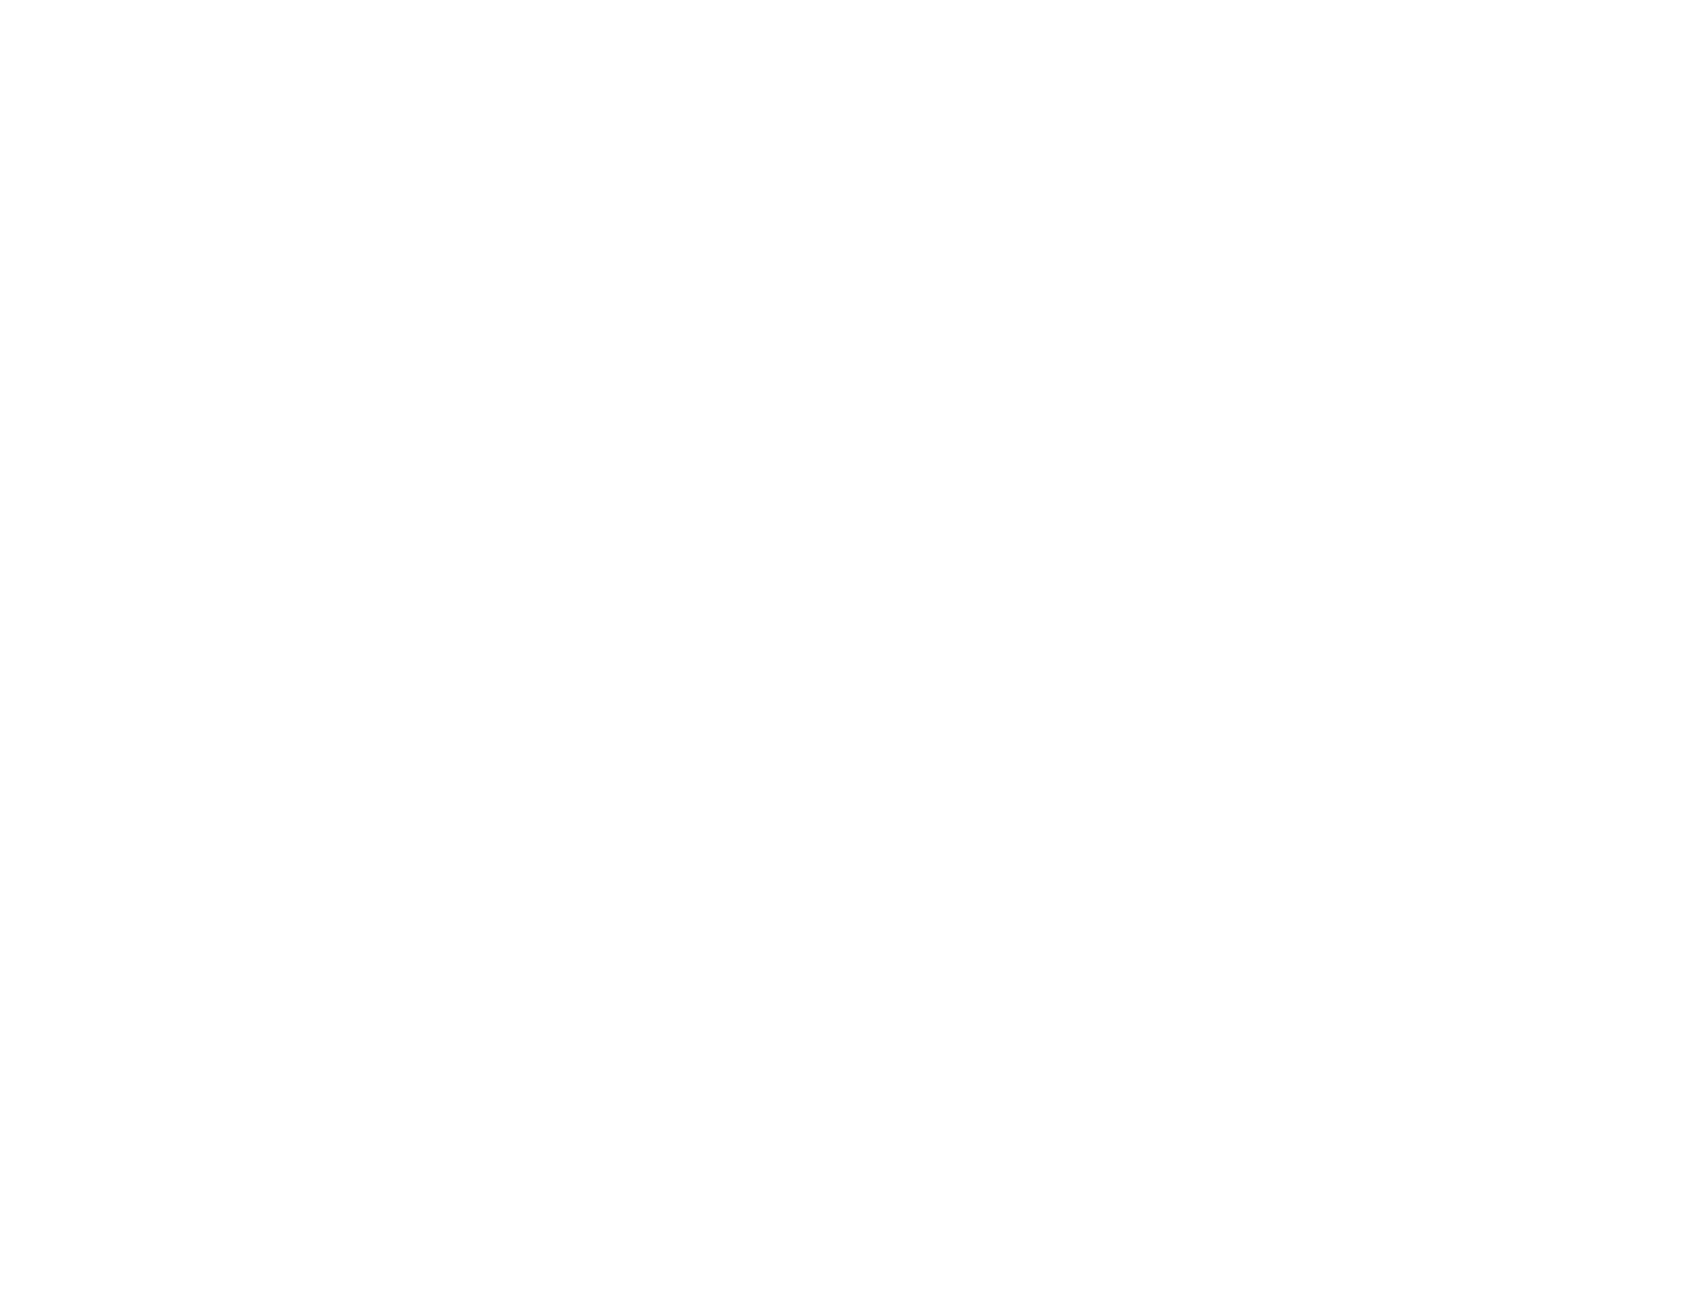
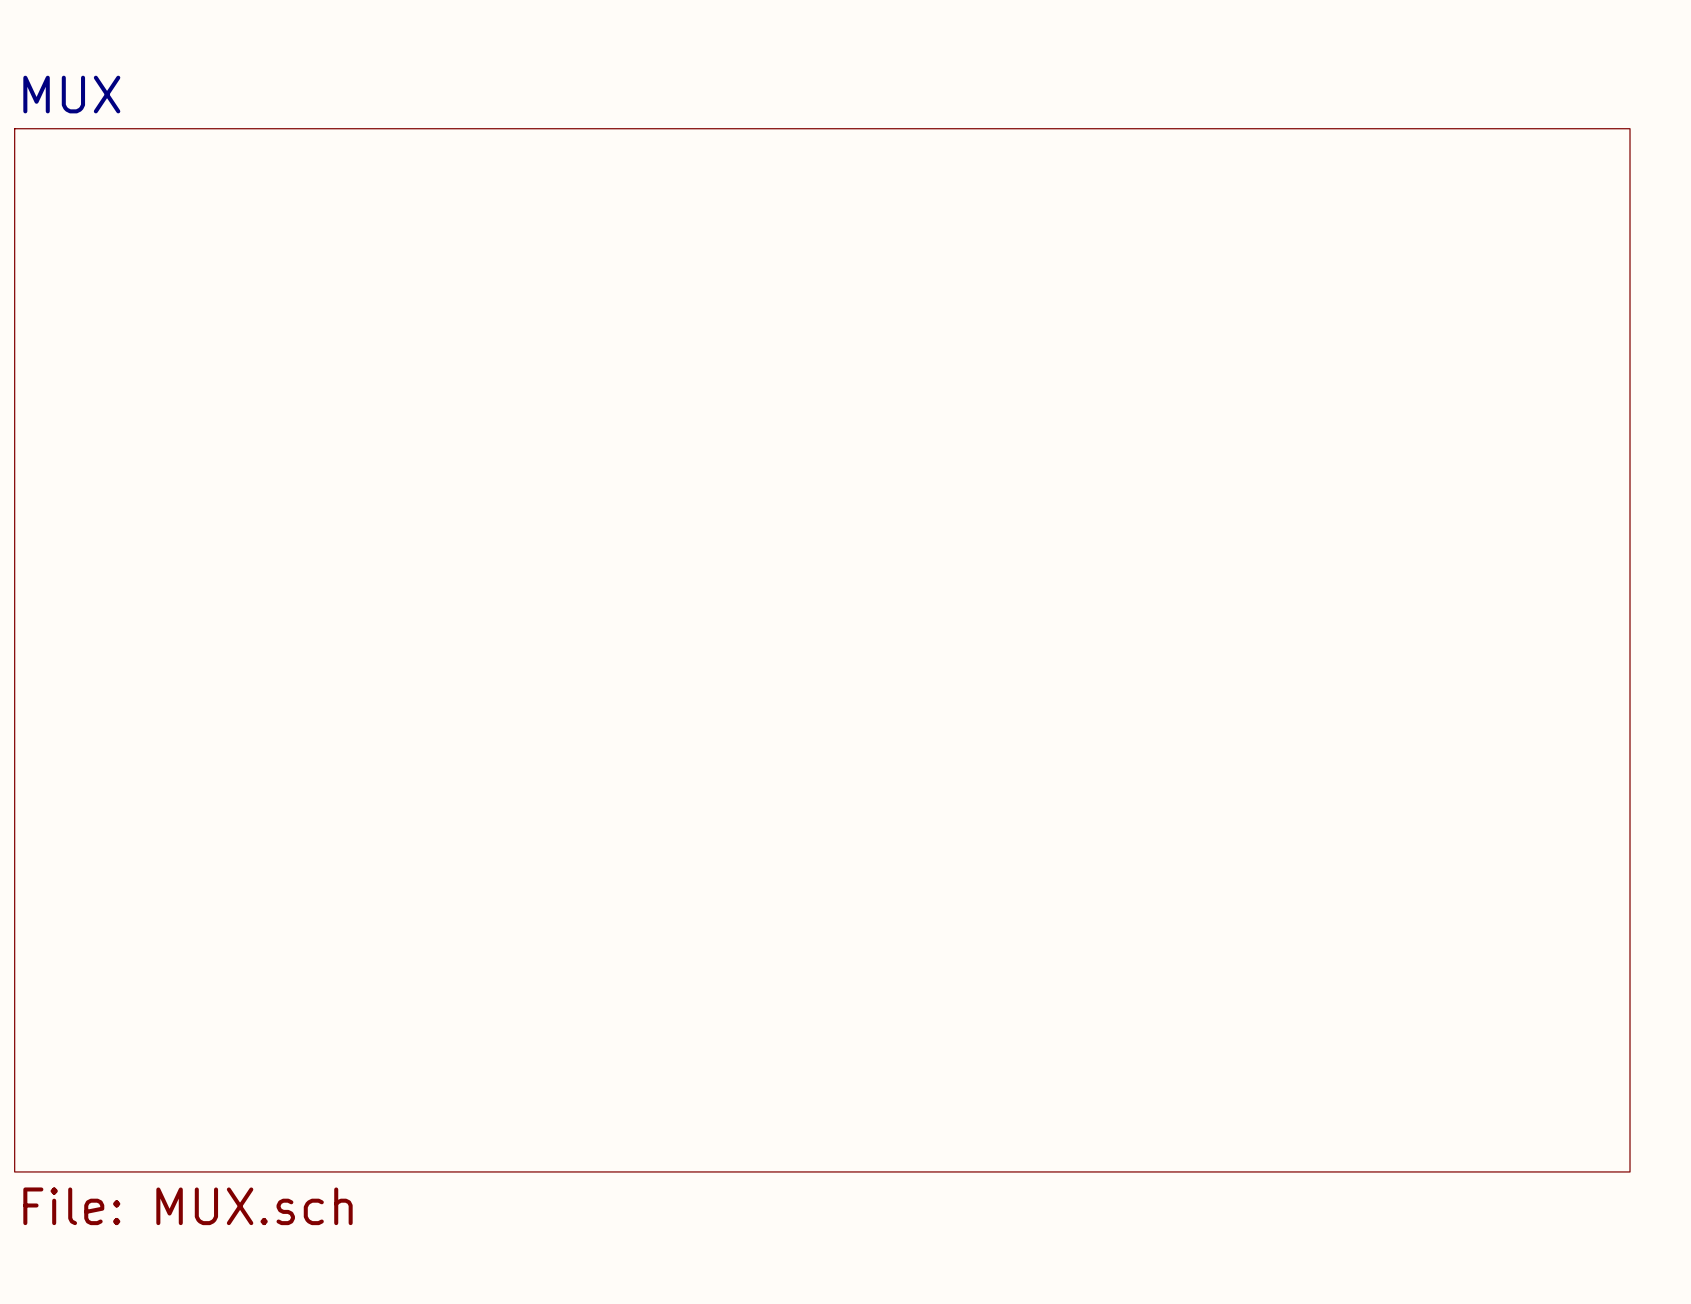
sheet MUX: none -> File: MUX.sch (822, 650)

